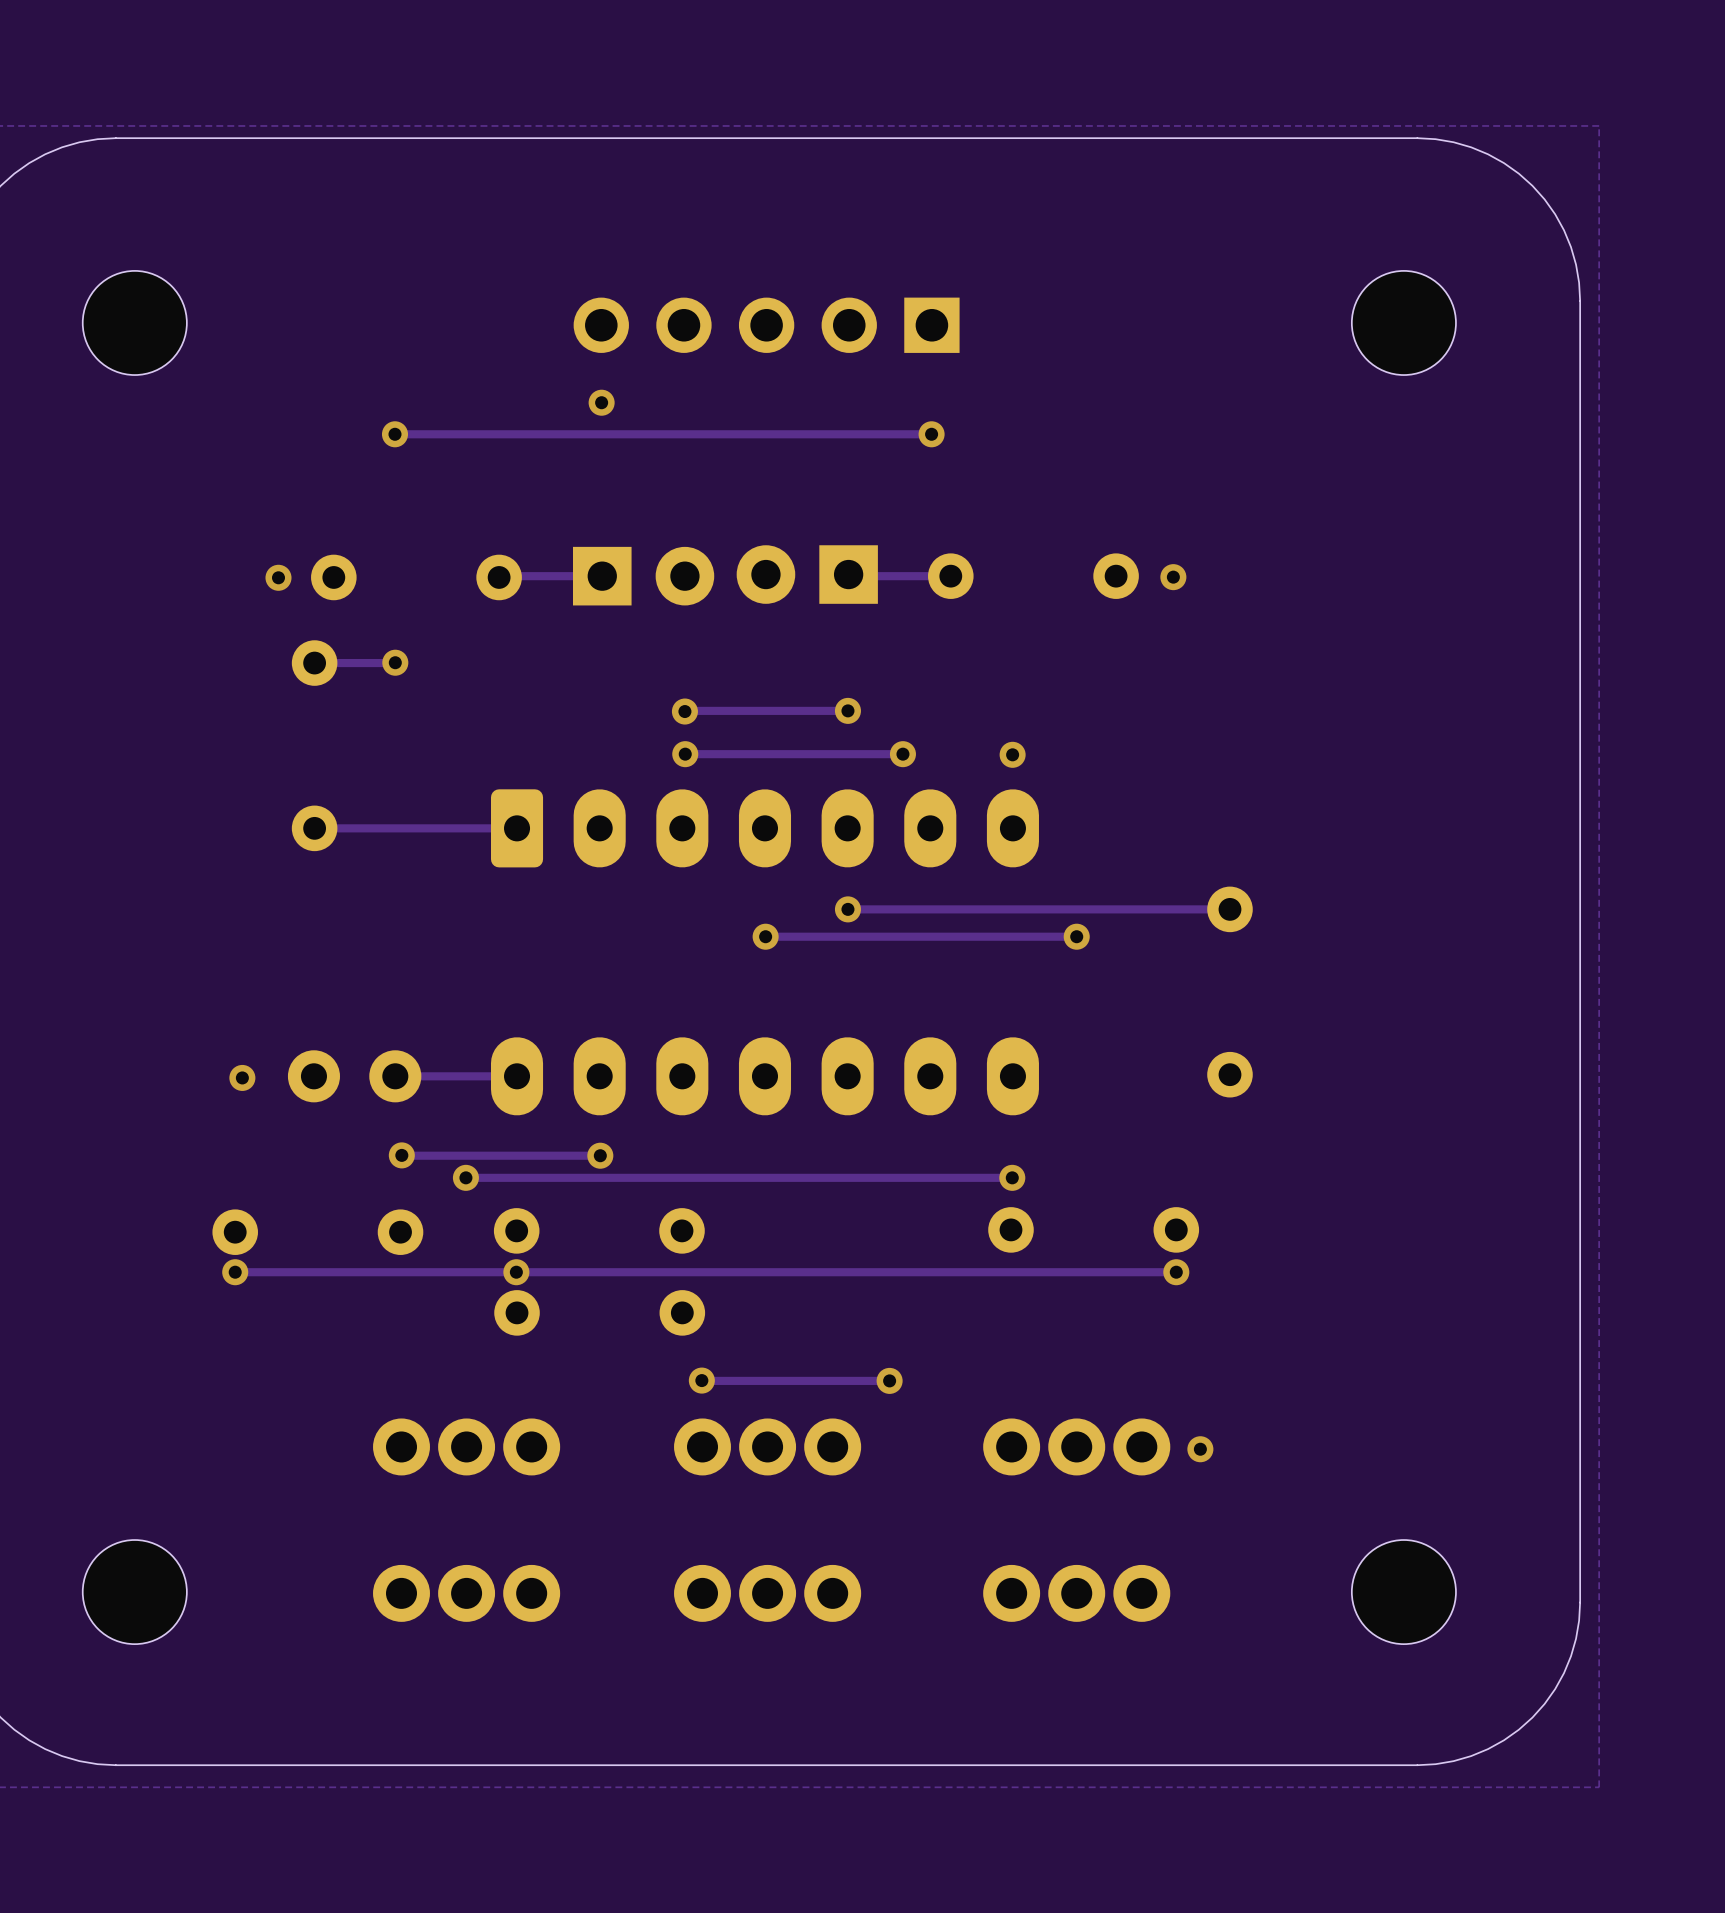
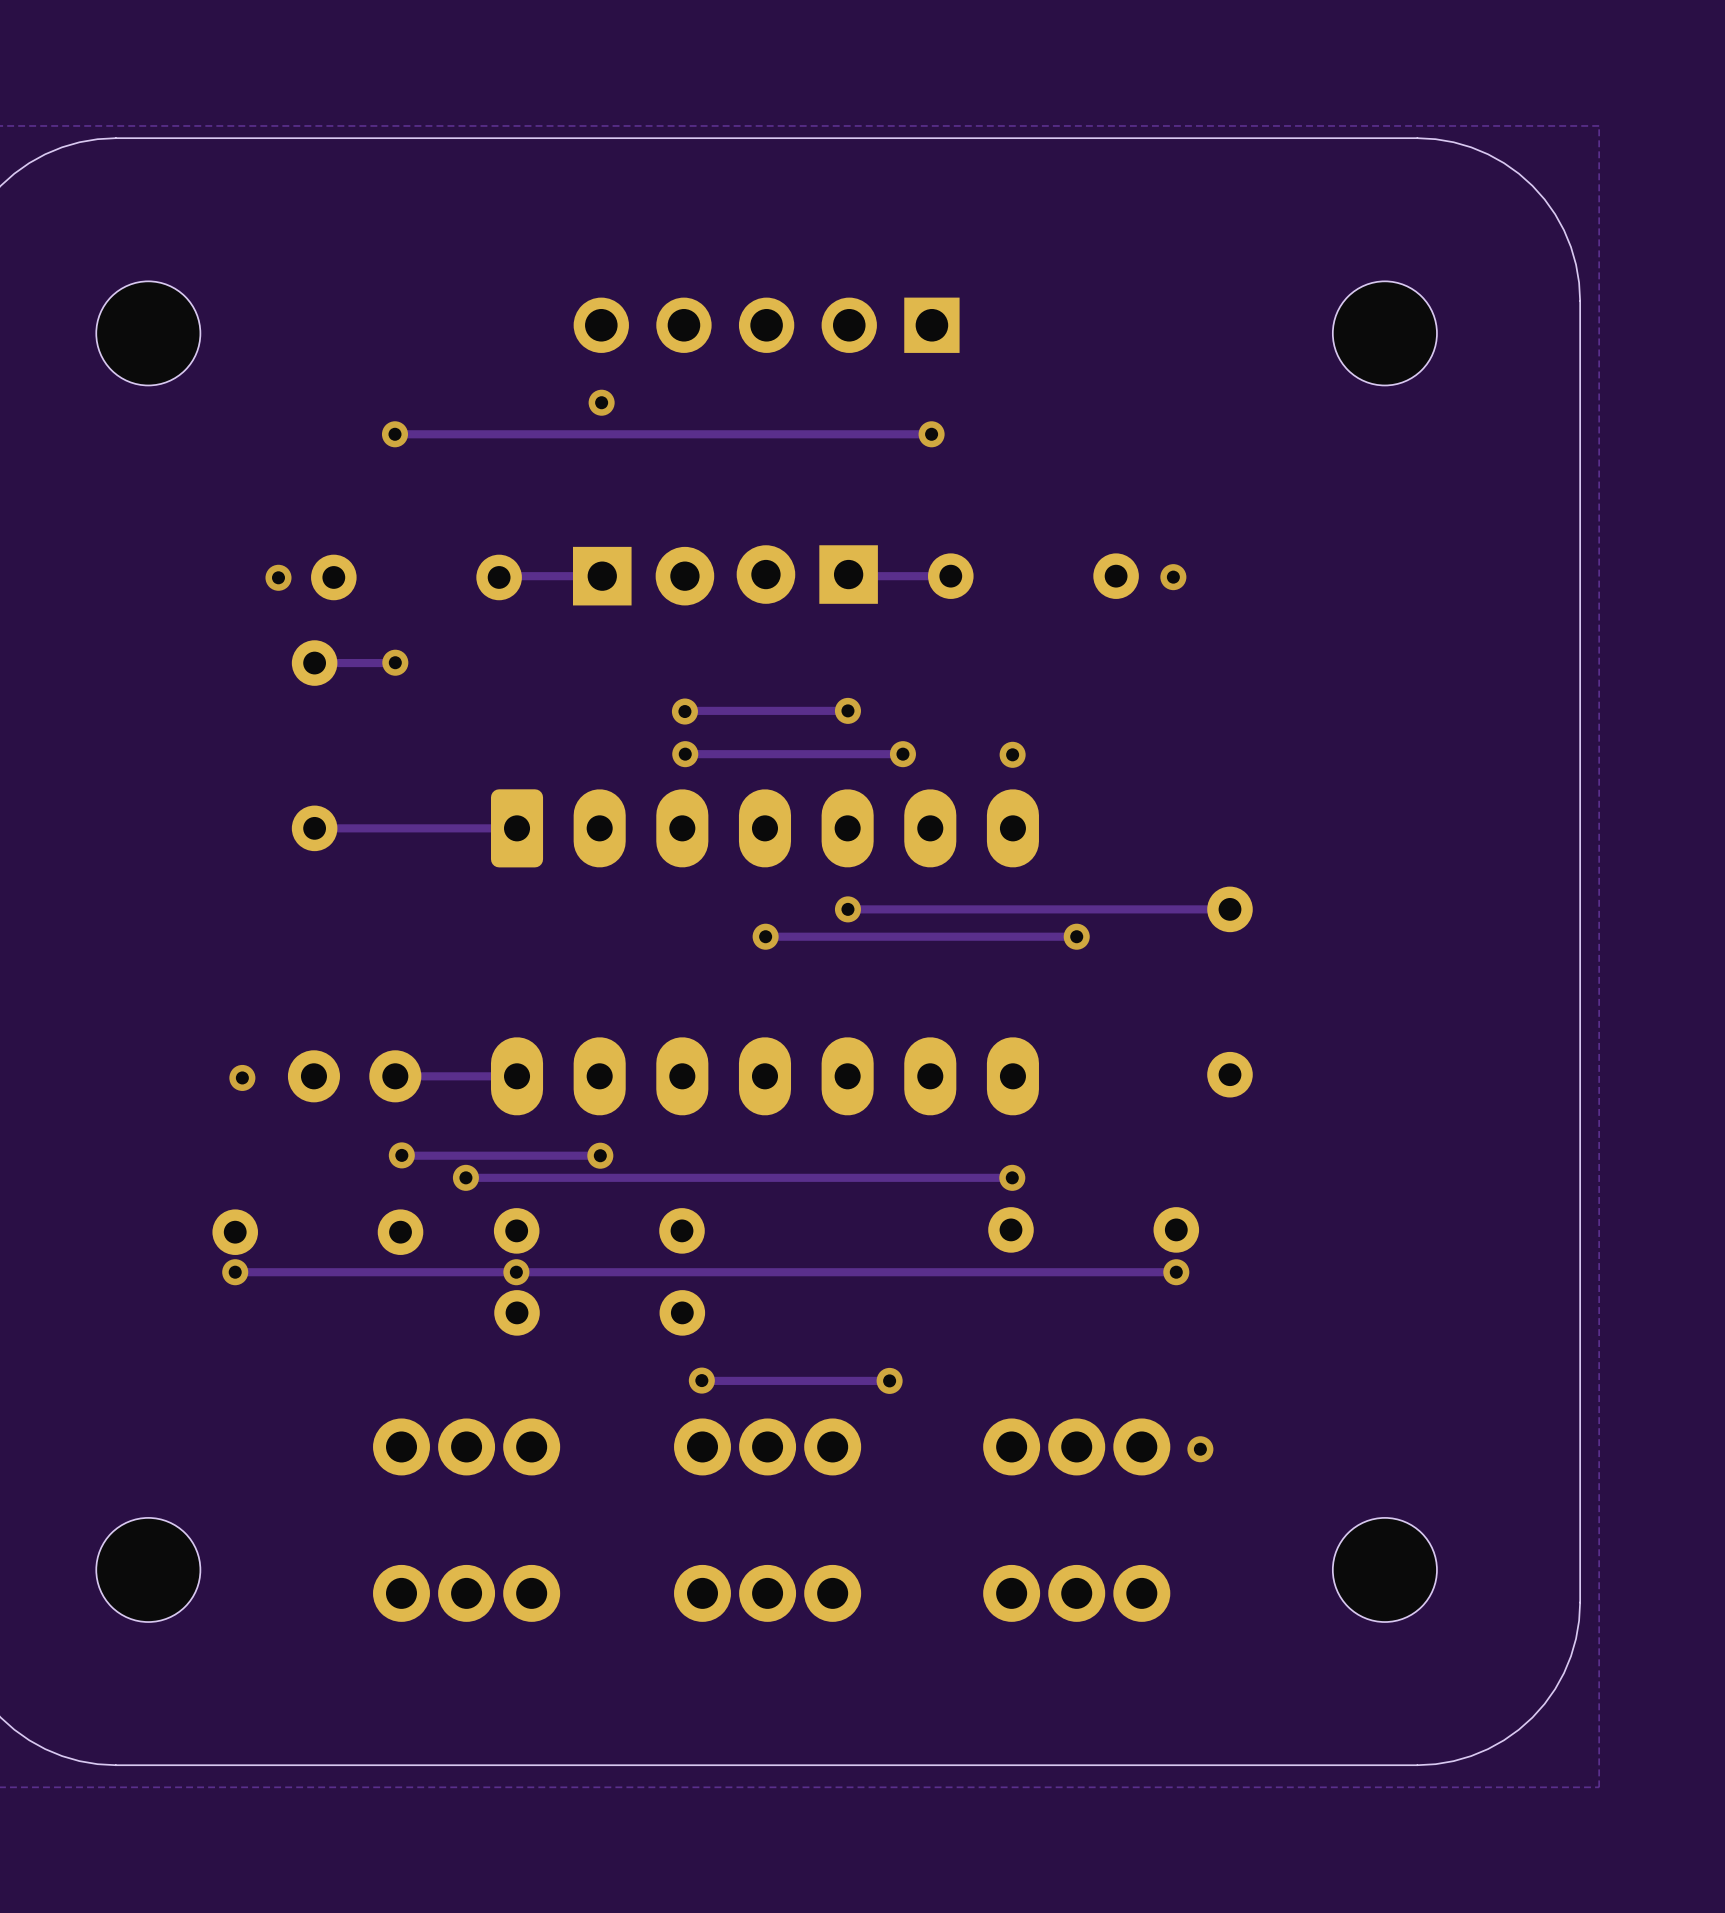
part position: (134, 322) -> (148, 333)
part position: (1403, 322) -> (1384, 333)
part position: (134, 1592) -> (148, 1569)
part position: (1403, 1592) -> (1384, 1569)

